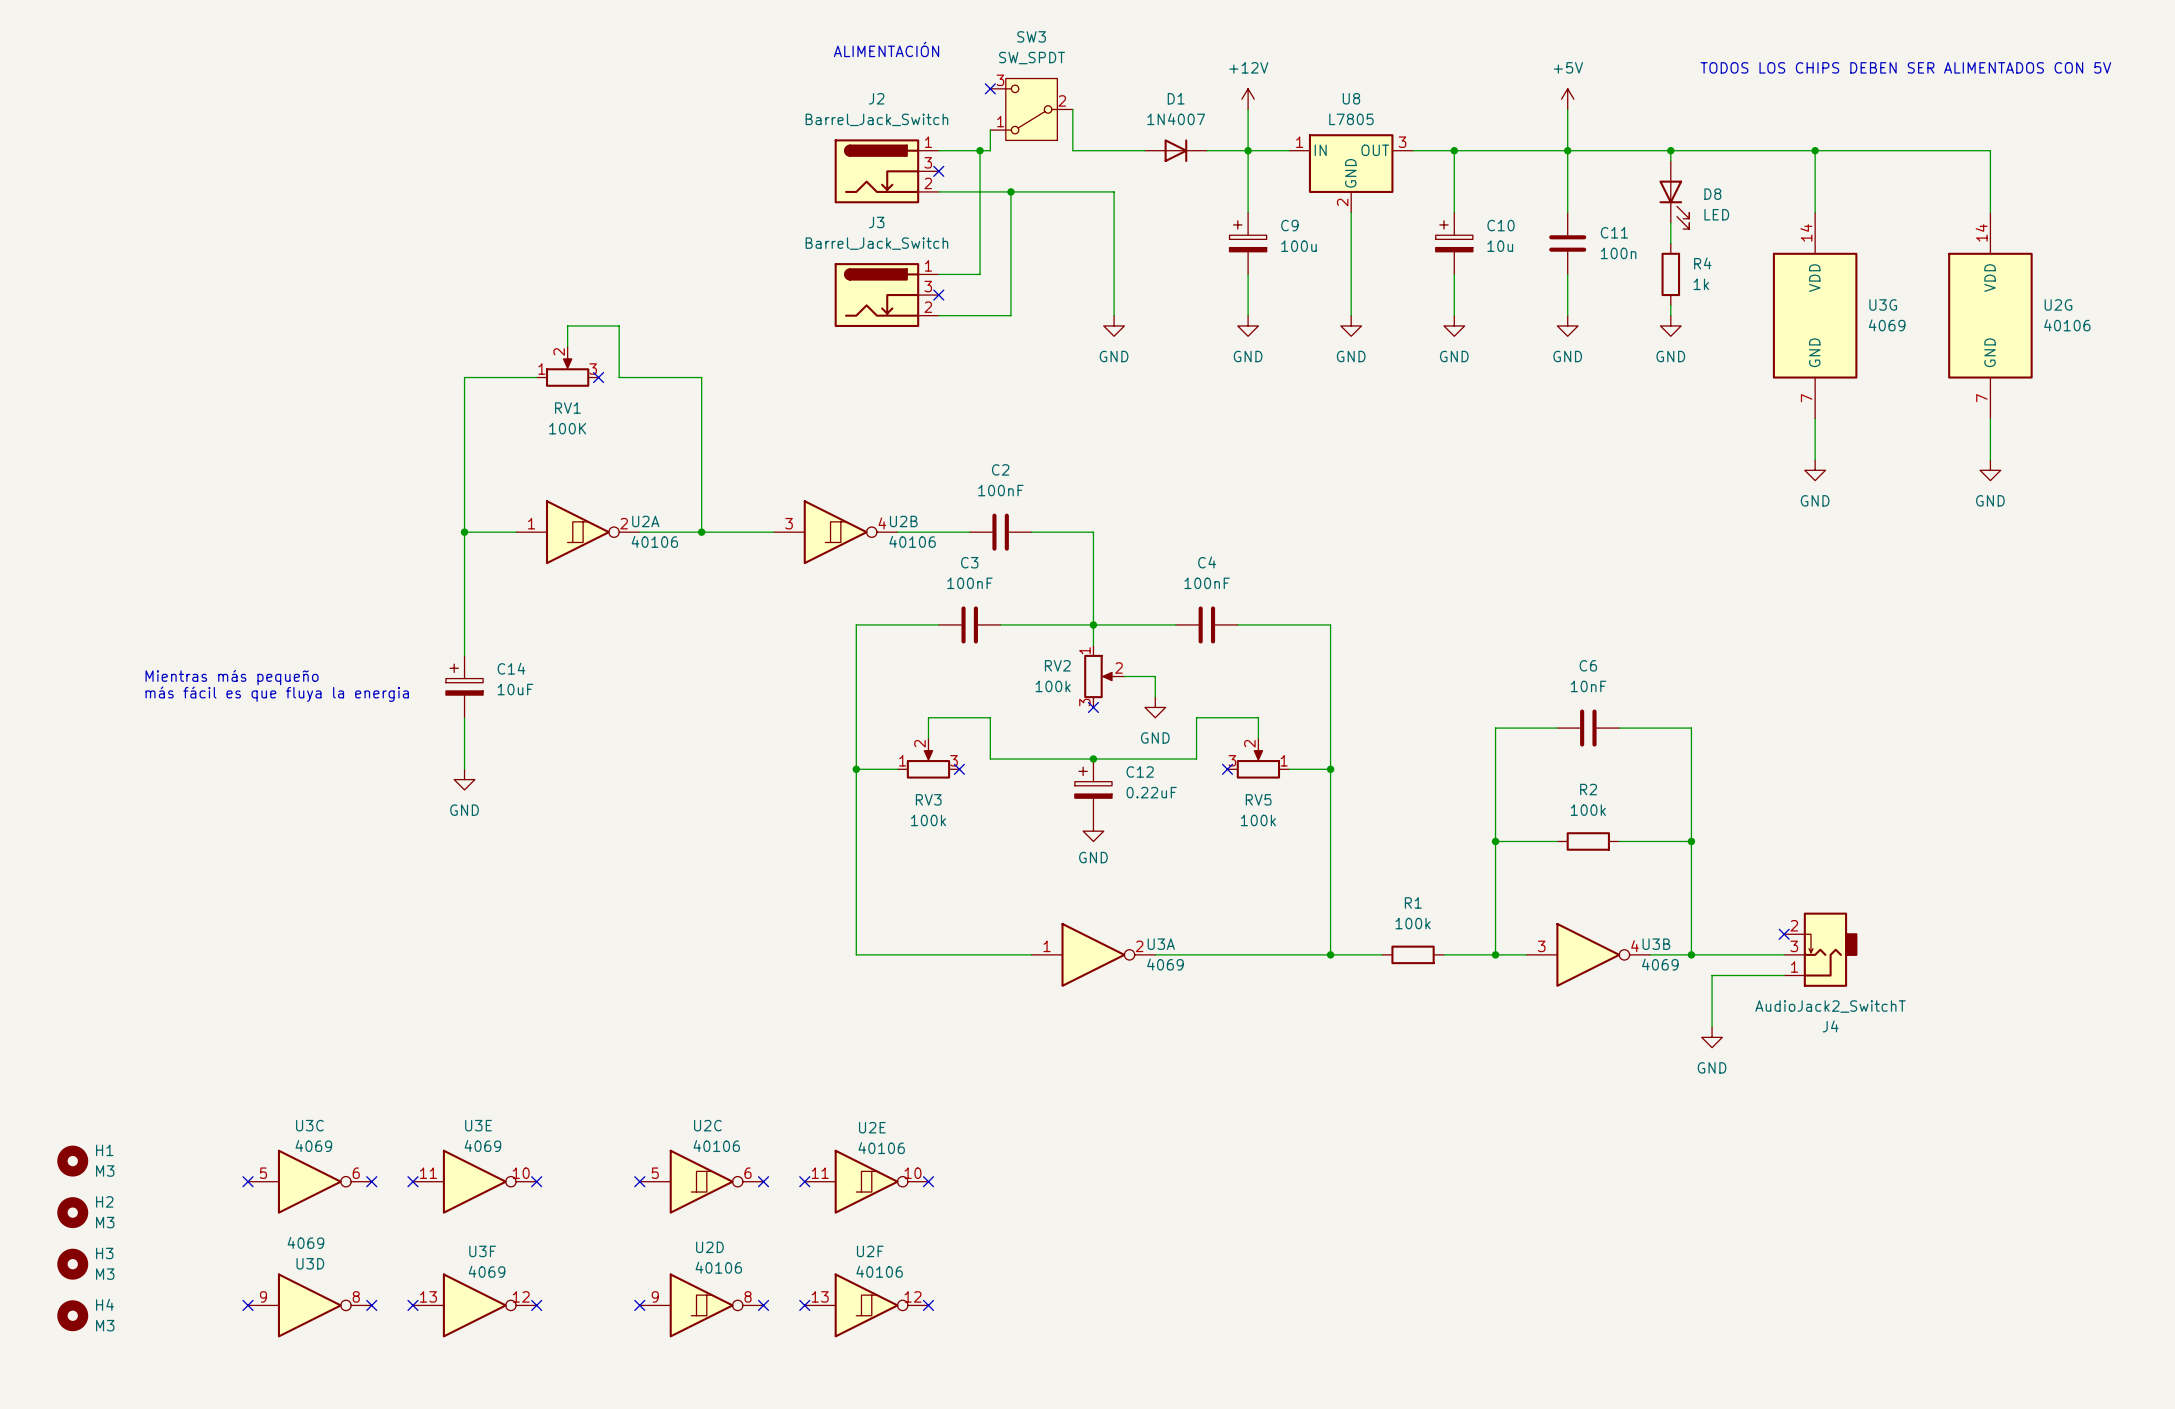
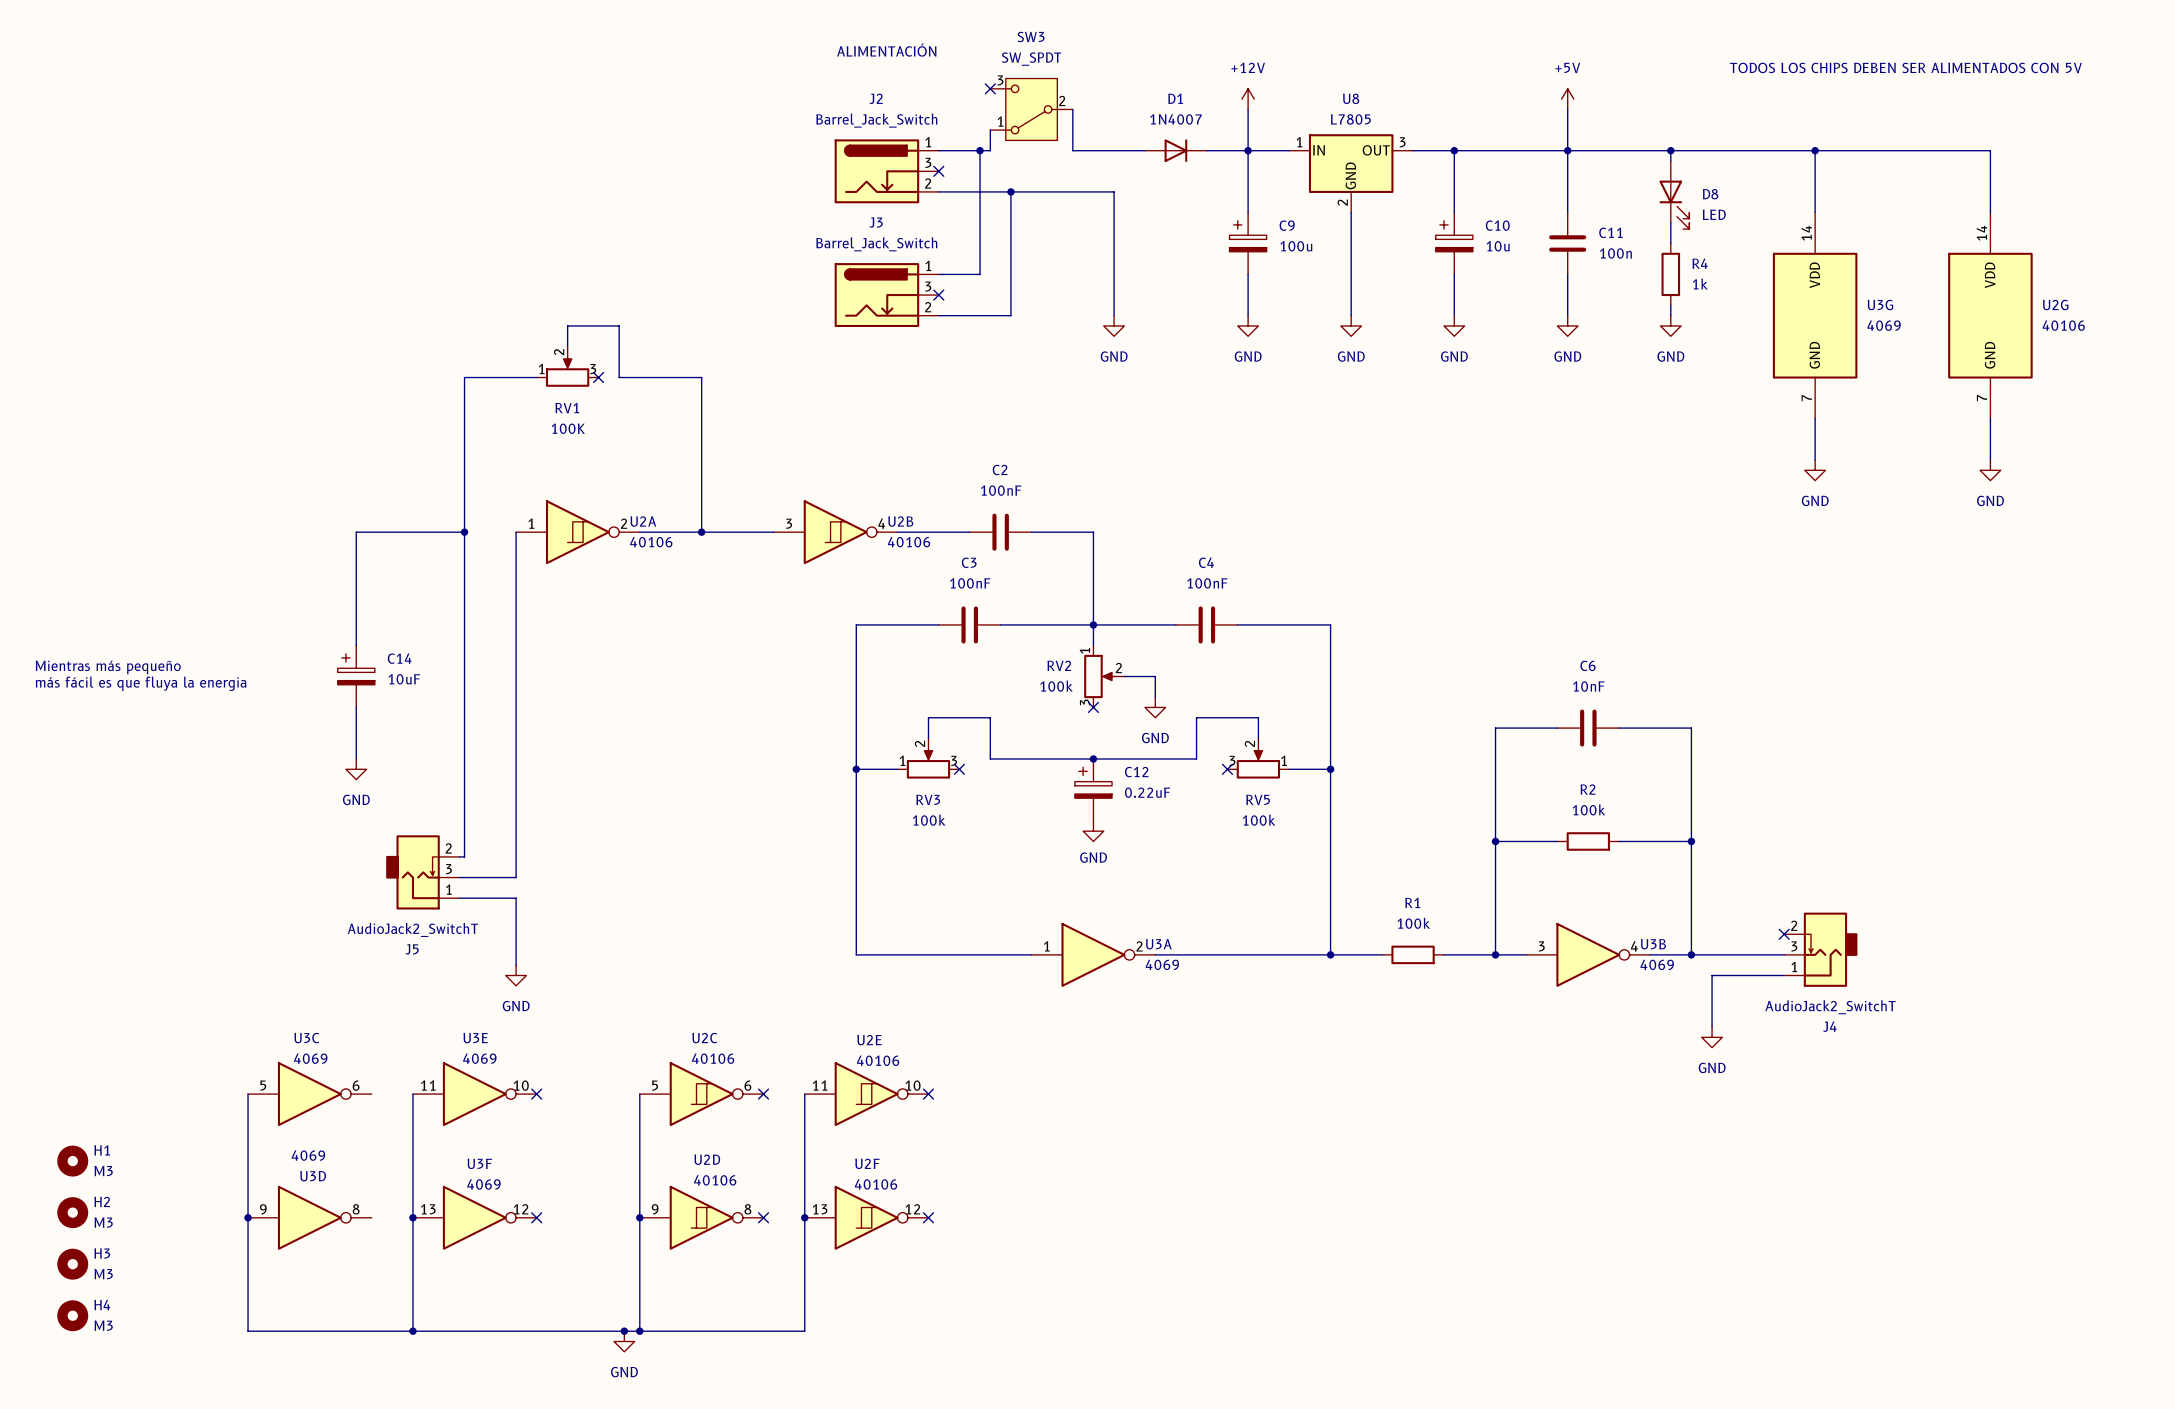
wire: (464, 532) (516, 532) -> (464, 532) (356, 532) (356, 645)
wire: none -> (516, 532) (516, 877) (459, 877)
text position: Mientras más pequeño (232, 677) -> Mientras más pequeño (108, 667)
C14 position: (464, 686) -> (356, 676)
text position: más fácil es que fluya la energia (277, 694) -> más fácil es que fluya la energia (141, 683)
wire: none -> (356, 707) (356, 758)
power symbol: none -> GND (356, 769)
wire: none -> (464, 769) (464, 856) (459, 856)
power symbol: GND (464, 779) -> none
J5: none -> AudioJack2_SwitchT (422, 872)
wire: none -> (459, 898) (516, 898) (516, 965)
power symbol: none -> GND (516, 975)
wire: none -> (248, 1094) (248, 1331) (804, 1331) (804, 1094)
wire: none -> (412, 1094) (412, 1331)
no-connect mark: none -> (536, 1094)
wire: none -> (639, 1094) (639, 1331)
no-connect mark: none -> (763, 1094)
no-connect mark: none -> (928, 1094)
no-connect mark: (248, 1181) -> none
U3C position: (309, 1181) -> (309, 1094)
no-connect mark: (371, 1181) -> none
no-connect mark: (412, 1181) -> none
U3E position: (474, 1181) -> (474, 1094)
no-connect mark position: (536, 1181) -> (536, 1217)
no-connect mark: (639, 1181) -> none
U2C position: (701, 1181) -> (701, 1094)
no-connect mark: (763, 1181) -> none
no-connect mark: (804, 1181) -> none
U2E position: (866, 1181) -> (866, 1094)
no-connect mark position: (928, 1181) -> (928, 1217)
junction: none -> (248, 1217)
junction: none -> (412, 1217)
junction: none -> (639, 1217)
no-connect mark: none -> (763, 1217)
junction: none -> (804, 1217)
no-connect mark: (248, 1305) -> none
U3D position: (309, 1305) -> (309, 1217)
no-connect mark: (371, 1305) -> none
no-connect mark: (412, 1305) -> none
U3F position: (474, 1305) -> (474, 1217)
no-connect mark: (536, 1305) -> none
no-connect mark: (639, 1305) -> none
U2D position: (701, 1305) -> (701, 1217)
no-connect mark: (763, 1305) -> none
no-connect mark: (804, 1305) -> none
U2F position: (866, 1305) -> (866, 1217)
no-connect mark: (928, 1305) -> none
junction: none -> (412, 1331)
junction: none -> (624, 1331)
junction: none -> (639, 1331)
power symbol: none -> GND (624, 1341)

